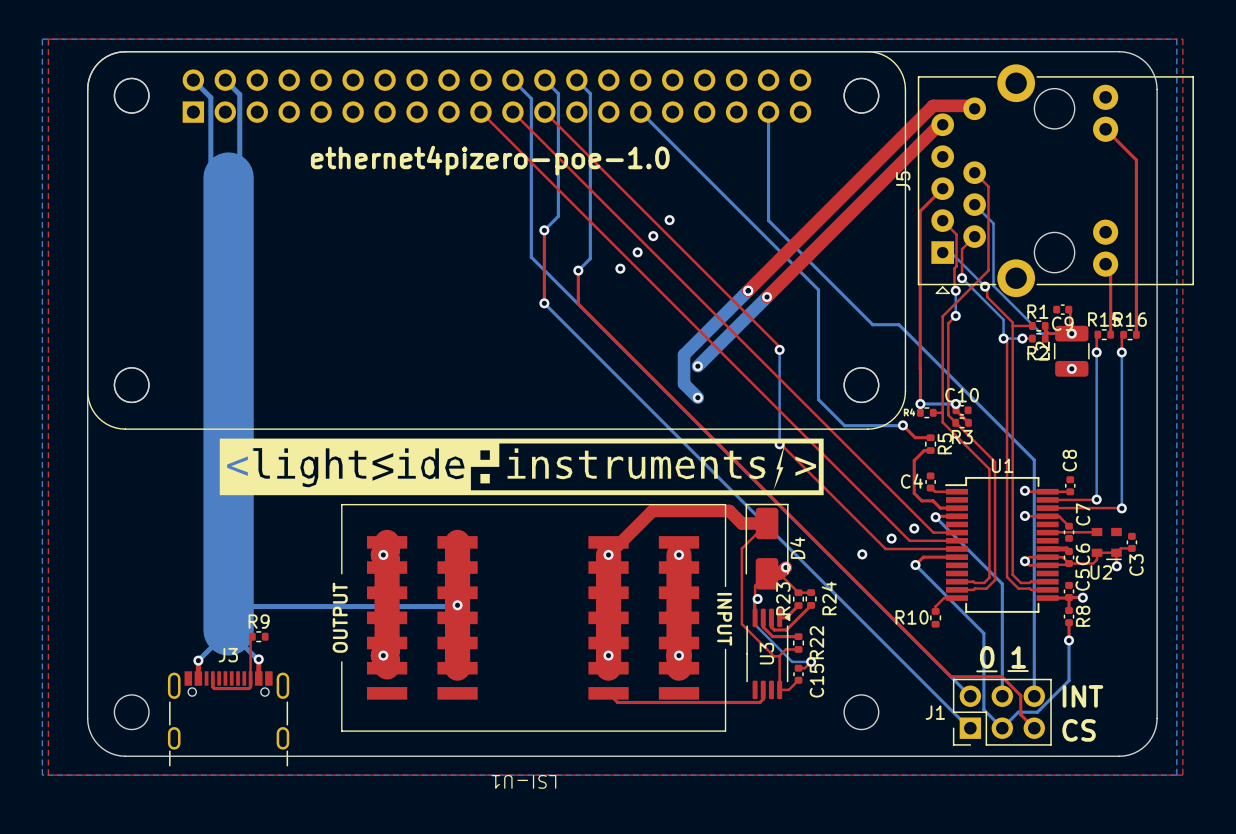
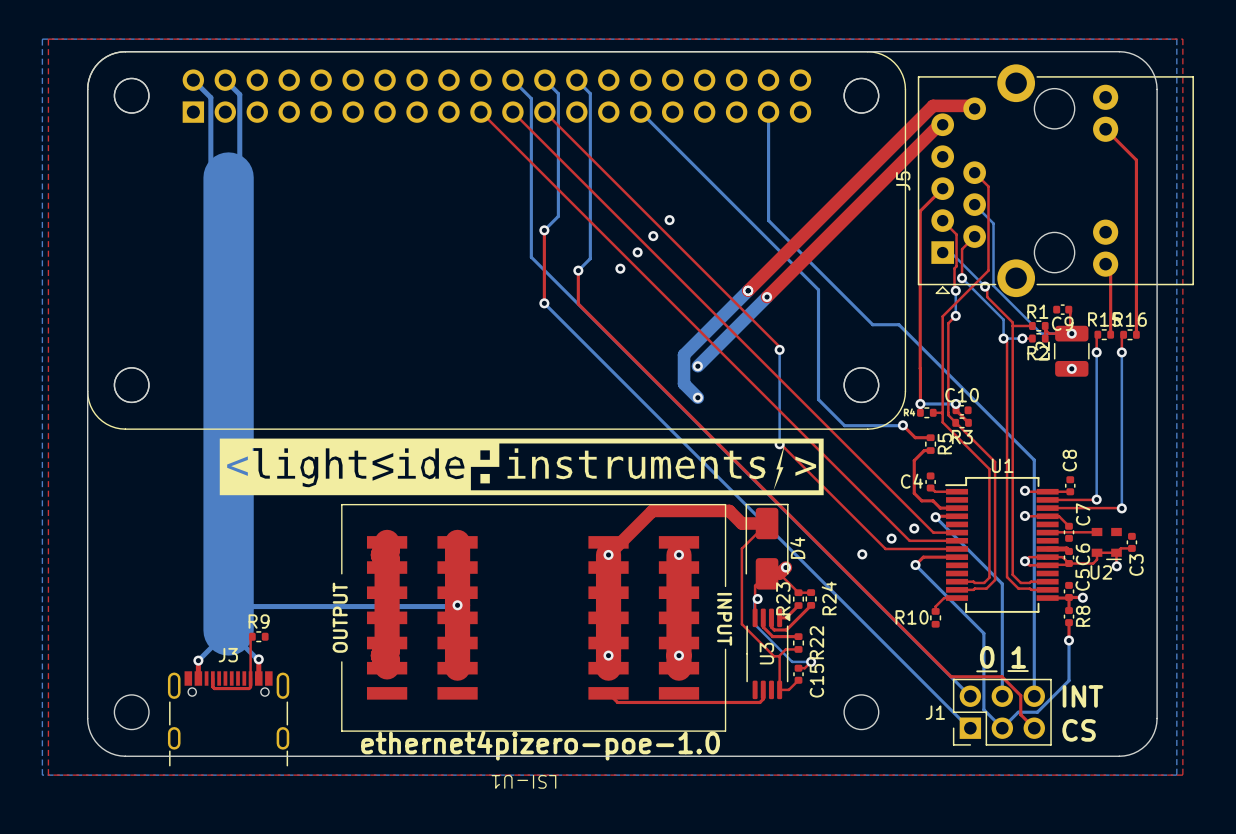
text: ethernet4pizero-poe-1.0 (490, 160) -> none
via: (383, 554) -> none
via: (383, 655) -> none
text: none -> ethernet4pizero-poe-1.0 (540, 745)

